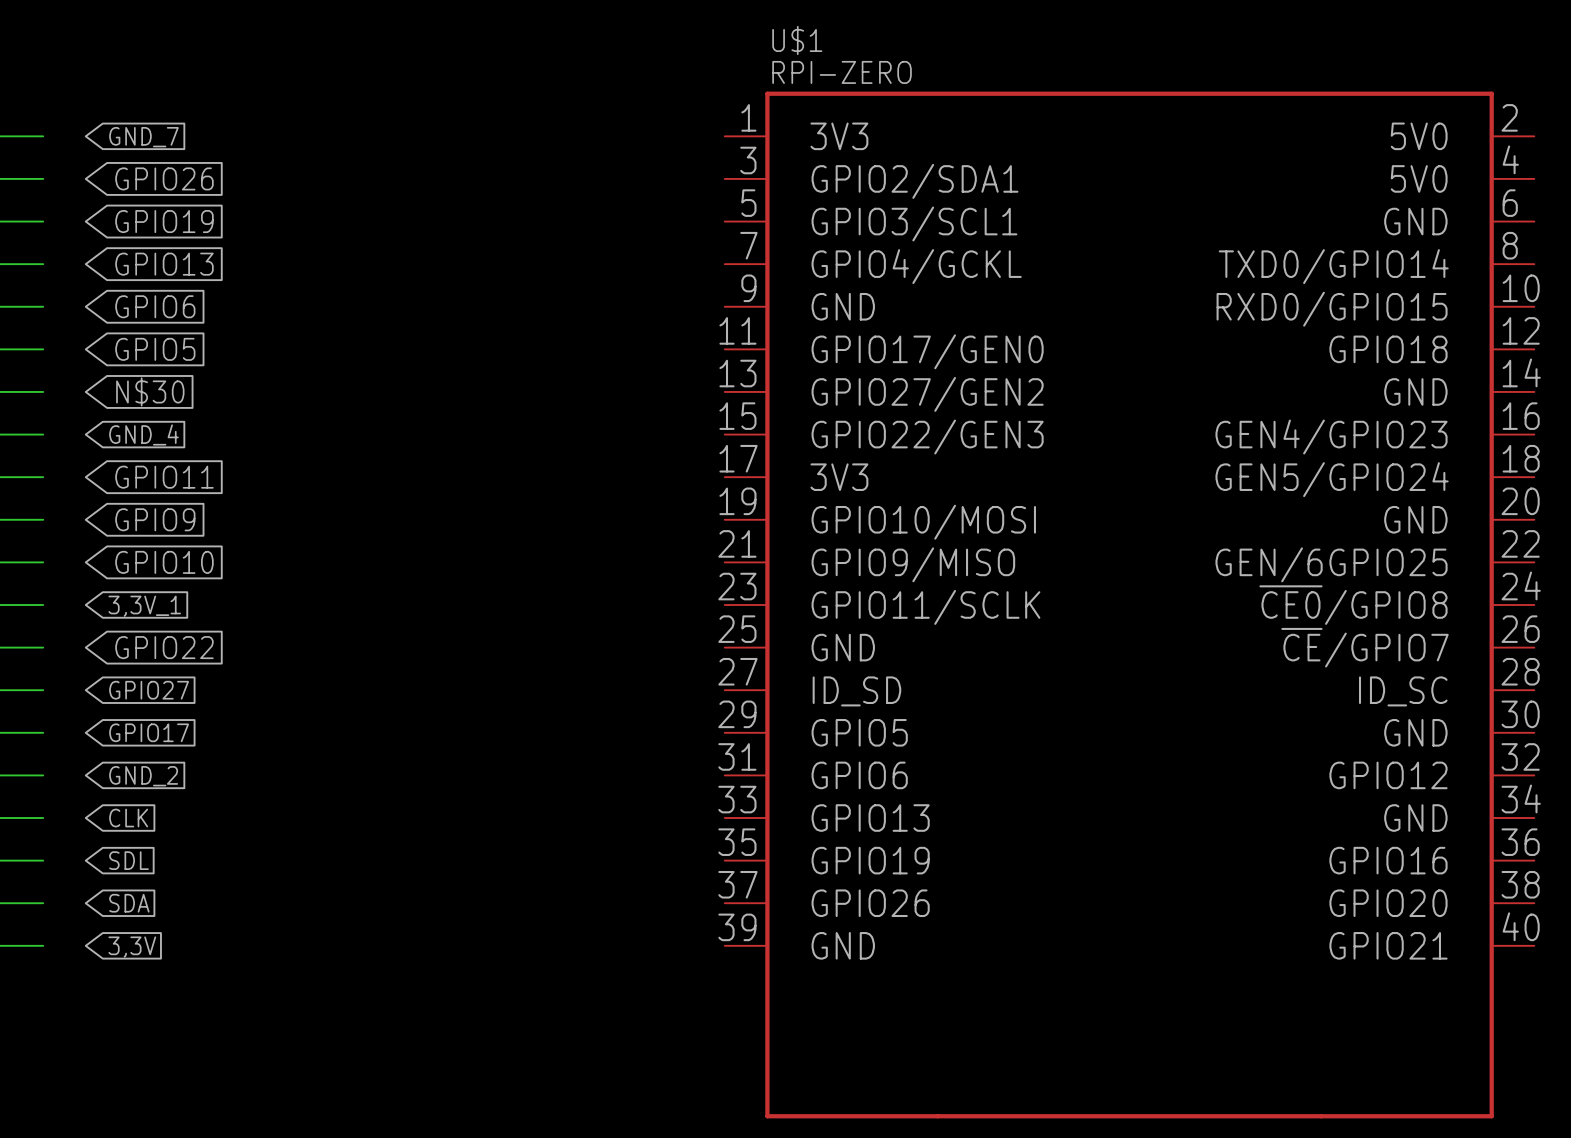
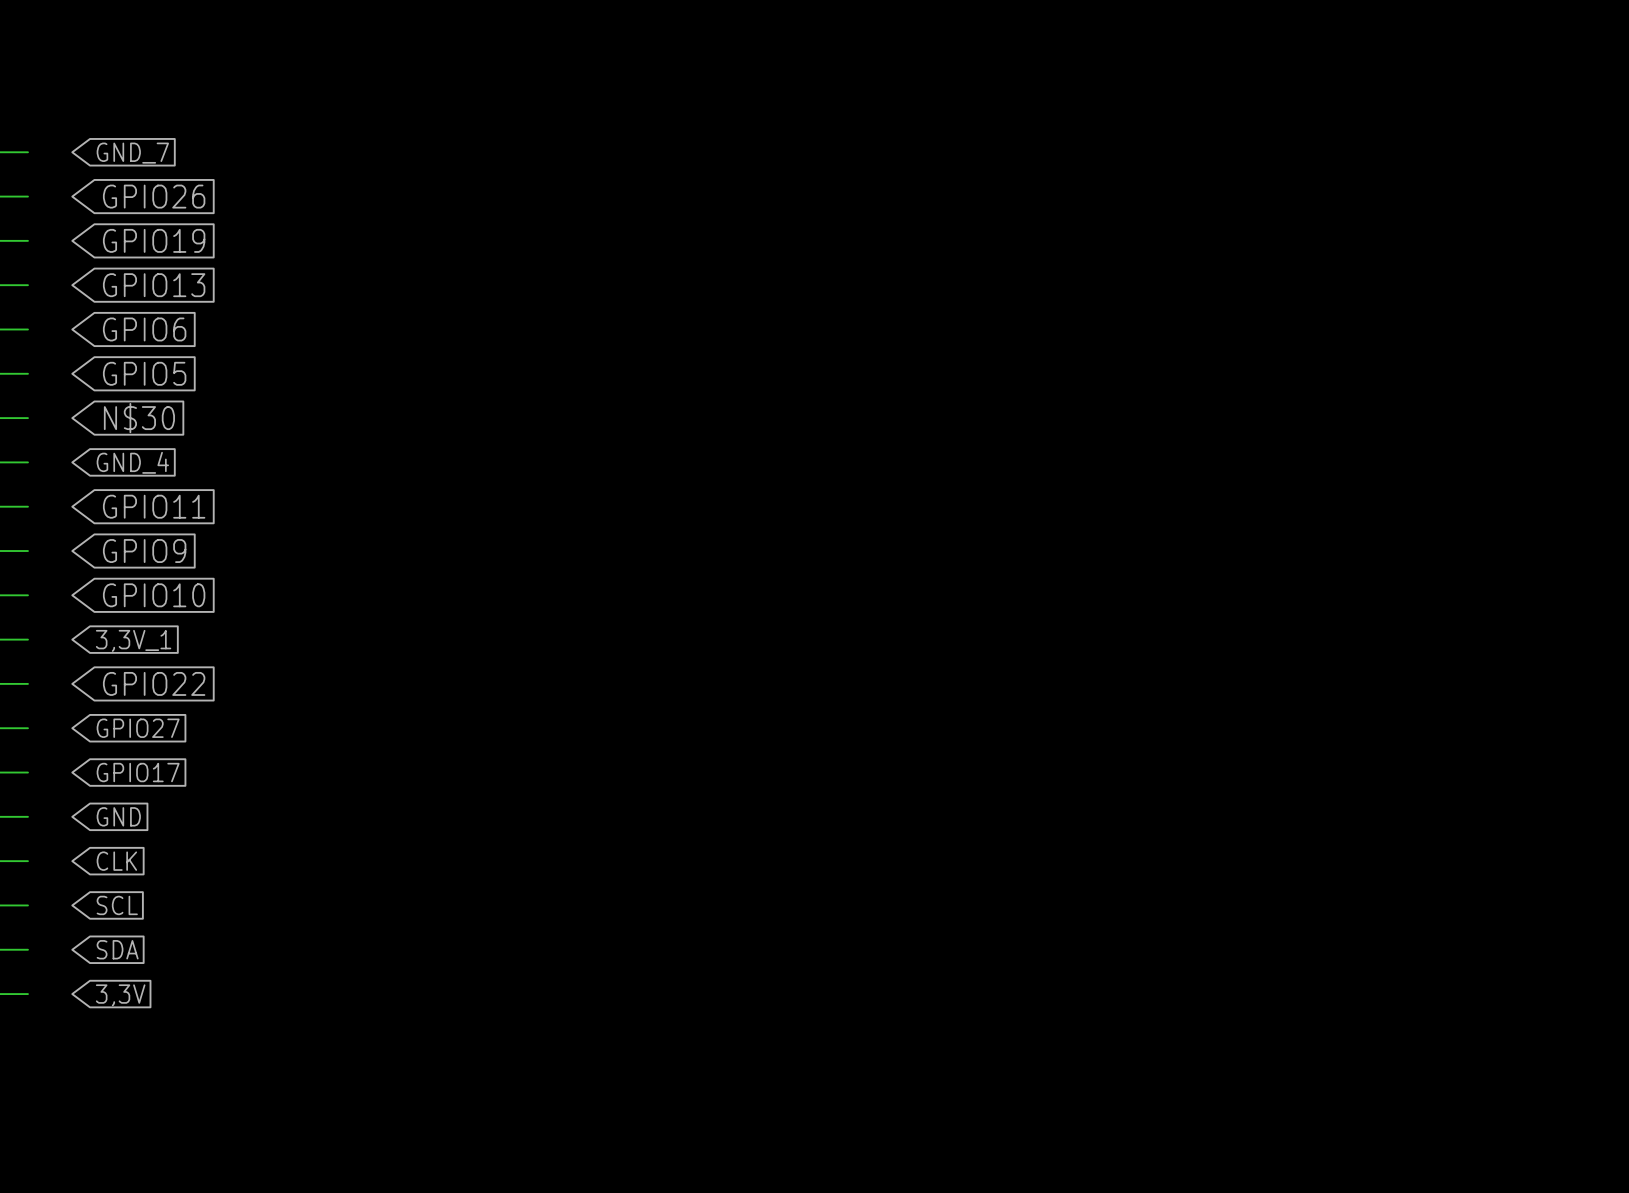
U$1: RPI-ZERO (1129, 604) -> none
global label: GND_2 (143, 776) -> GND (118, 816)
global label: SDL (129, 860) -> SCL (117, 905)

